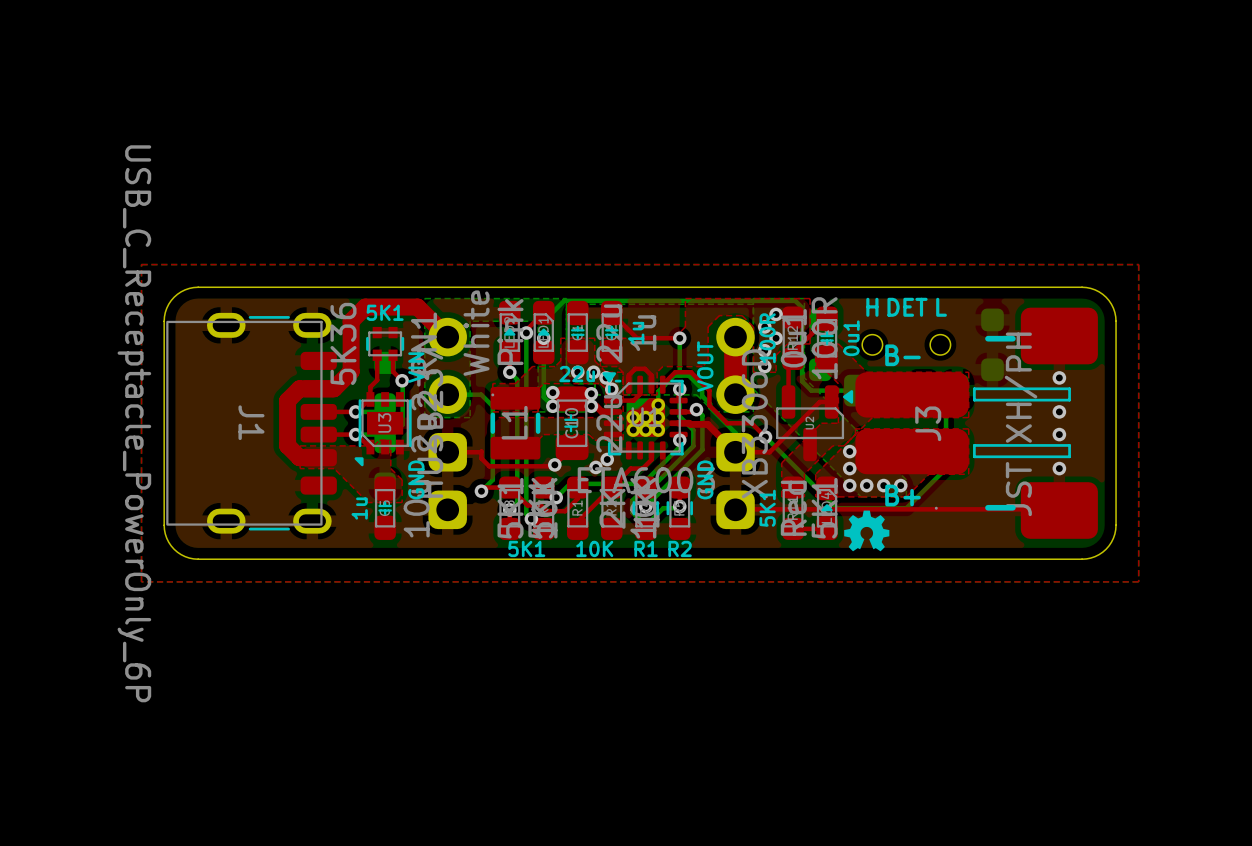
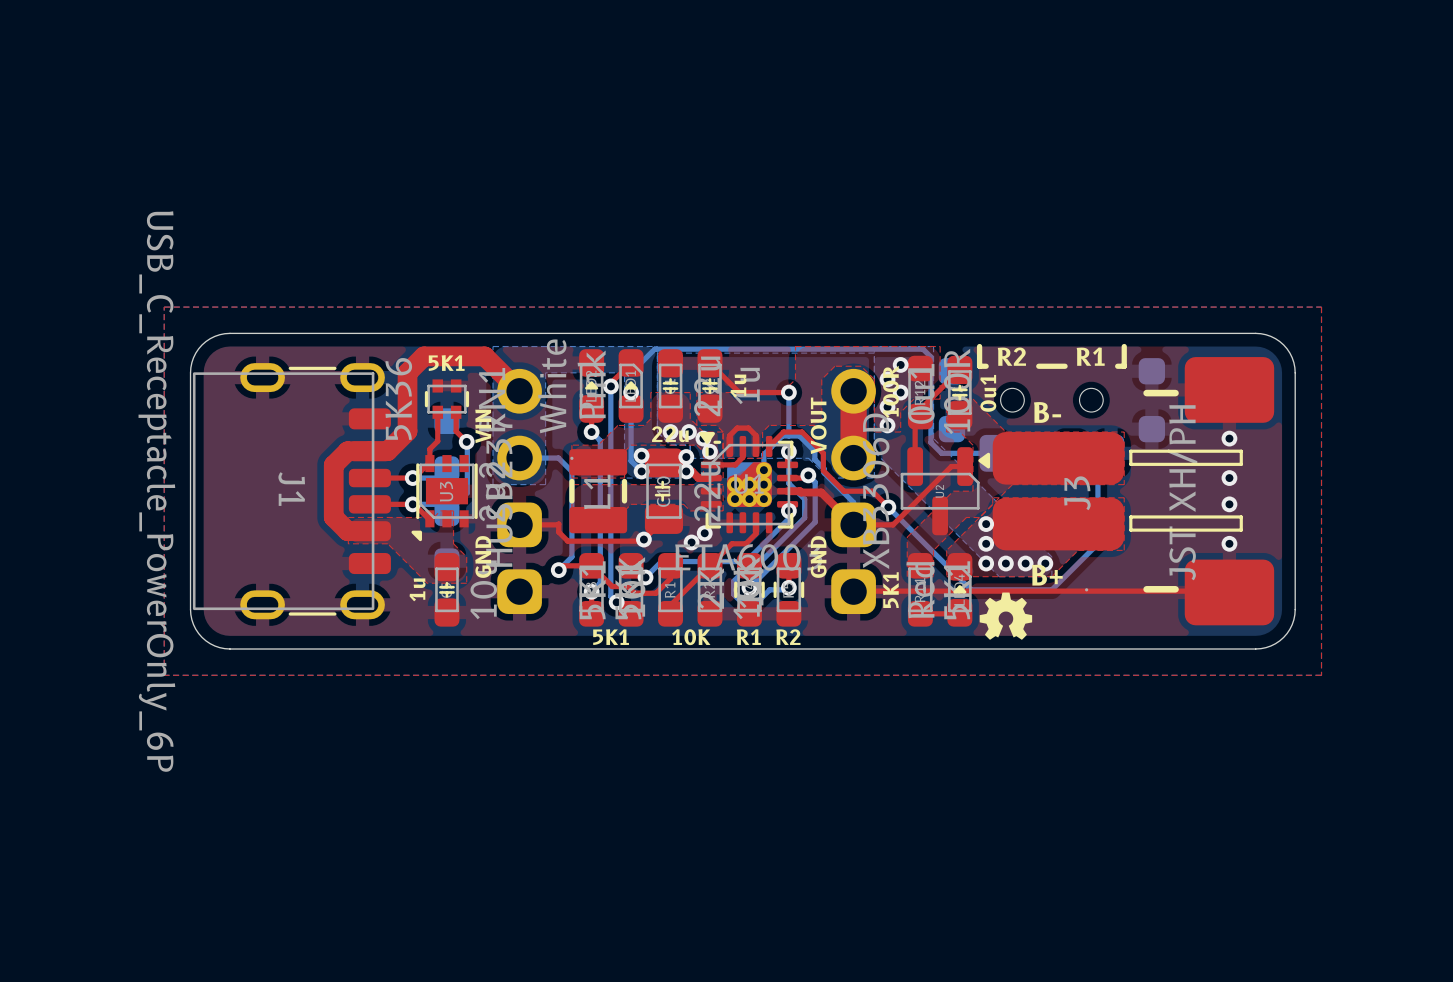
line: none -> (979, 346) (979, 366) (986, 366)
line: none -> (1124, 346) (1124, 366) (1117, 366)
text: H (872, 307) -> R2 (1011, 356)
text: DET (907, 307) -> none
text: L (941, 307) -> R1 (1090, 356)
line: none -> (1038, 366) (1065, 366)

